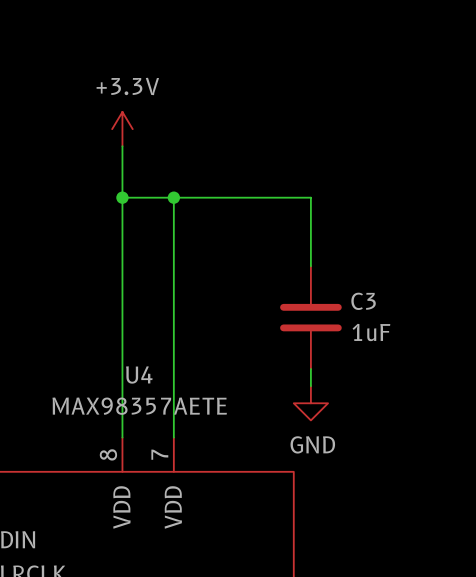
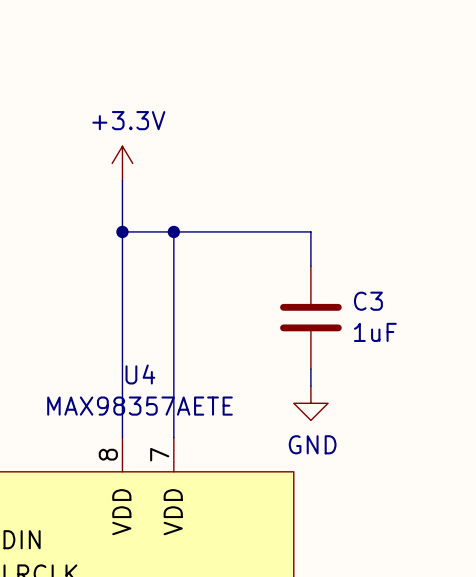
power symbol position: +3.3V (122, 129) -> +3.3V (122, 163)
wire: (122, 197) (310, 197) (310, 231) -> (122, 231) (310, 231)
junction: (122, 197) -> none
wire: (173, 197) (173, 231) -> none
junction: (173, 197) -> none
junction: none -> (122, 231)
junction: none -> (173, 231)

